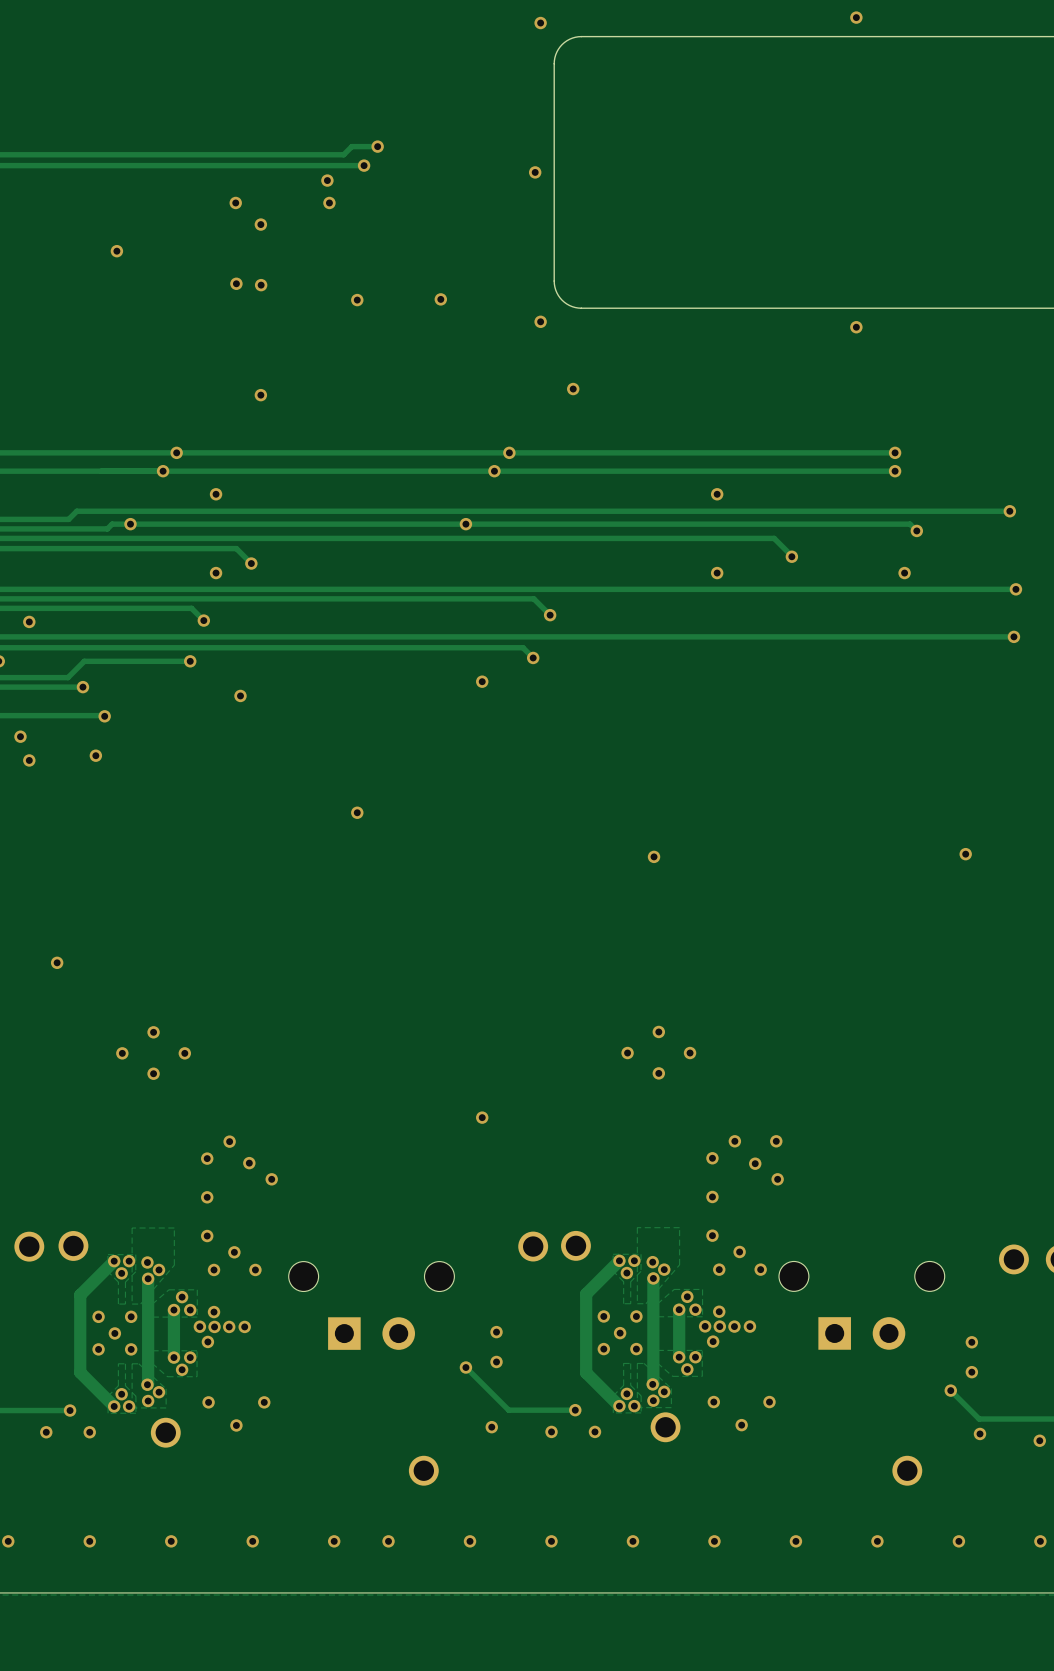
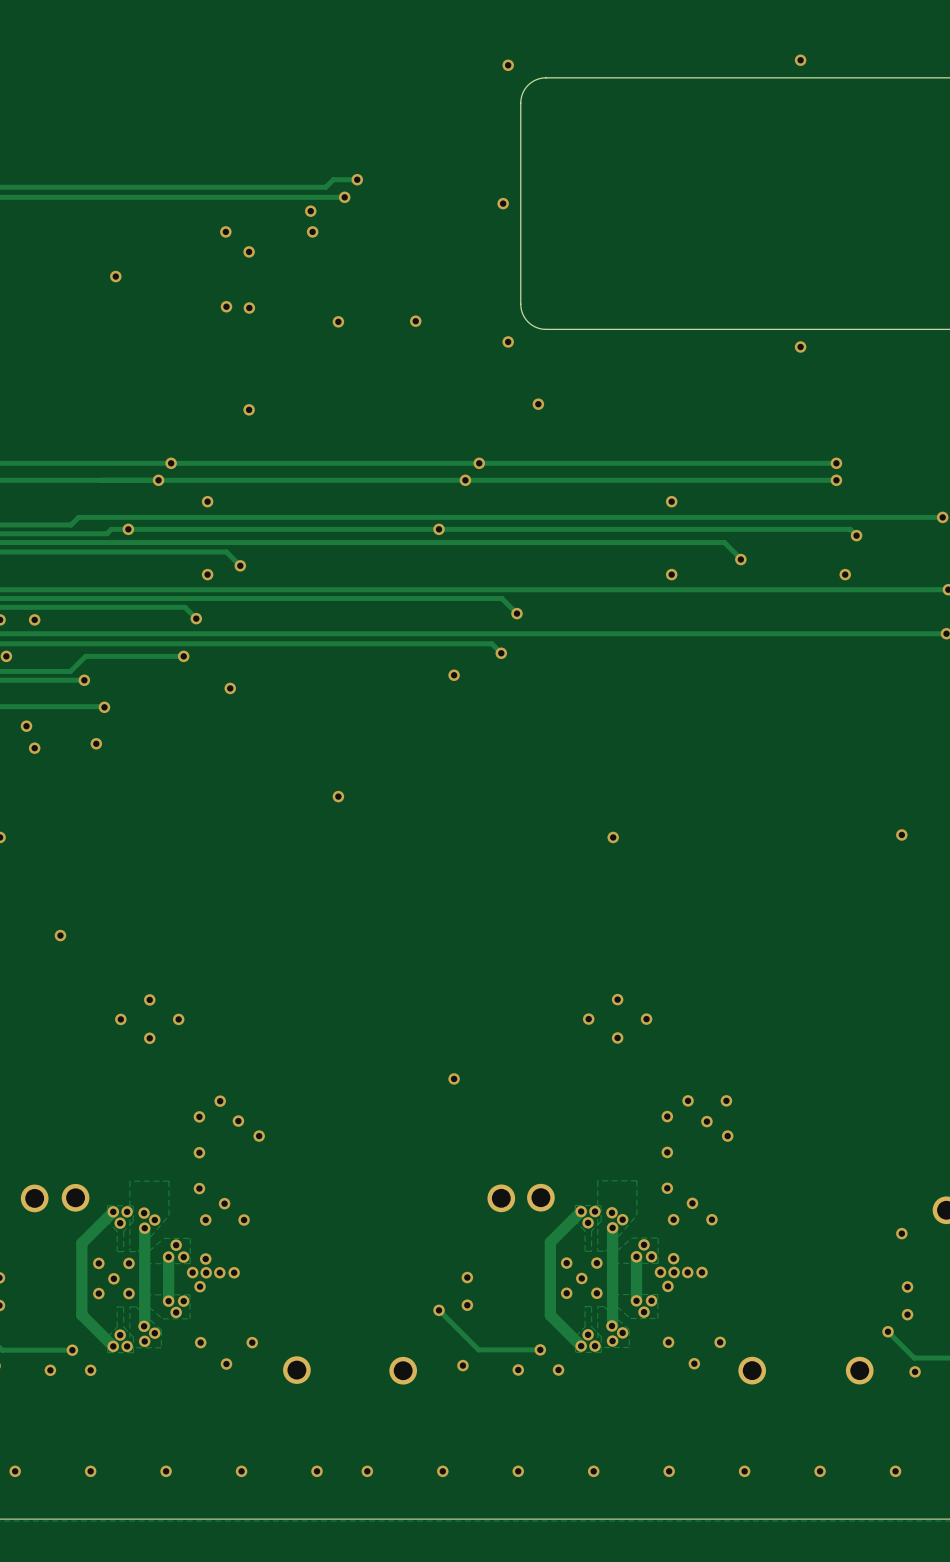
via: none -> (901, 1233)
part: (371, 1305) -> none
part: (861, 1305) -> none
part: (665, 1427) -> none
part: (165, 1432) -> none
part: none -> (296, 1370)
part: none -> (752, 1370)
part position: (423, 1470) -> (403, 1370)
part position: (907, 1470) -> (859, 1370)

